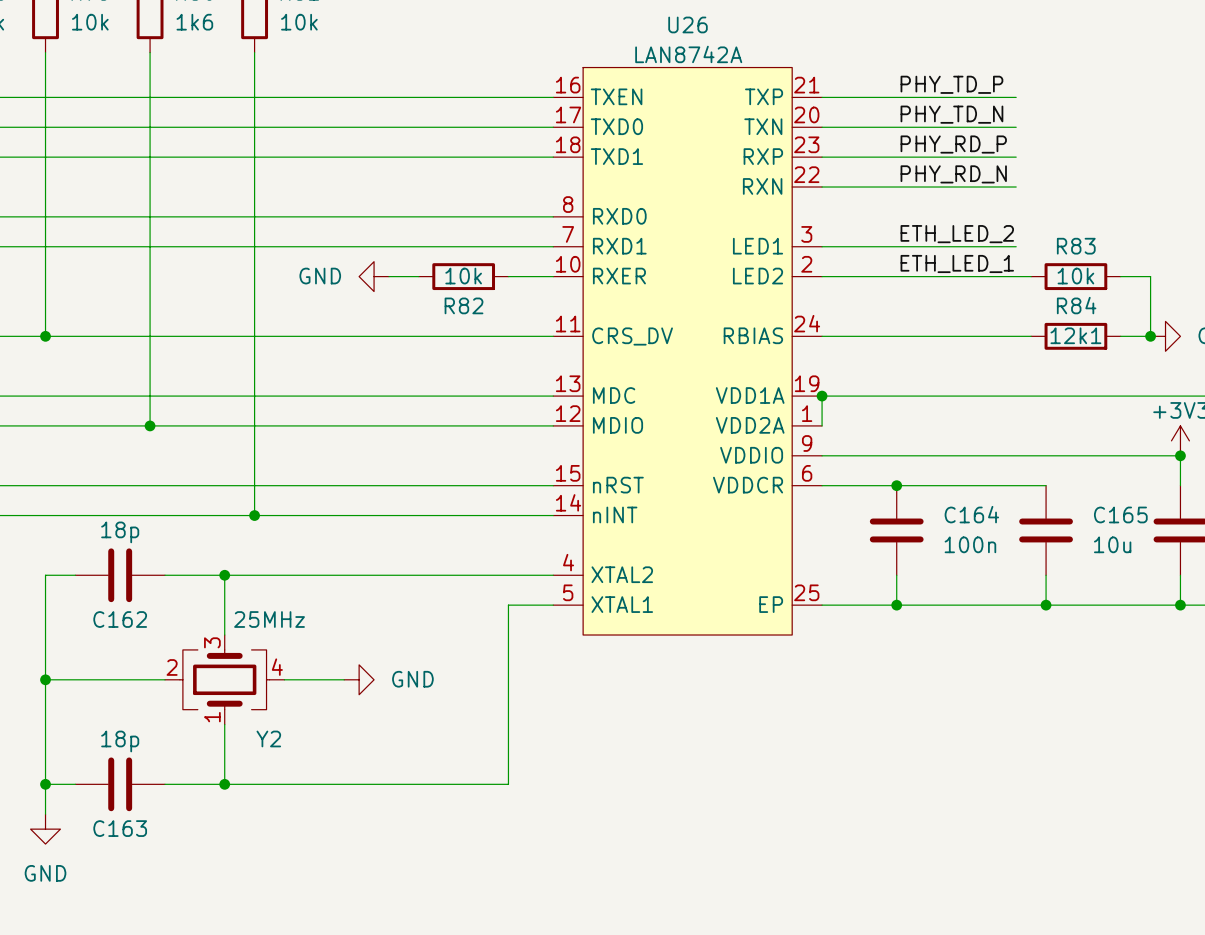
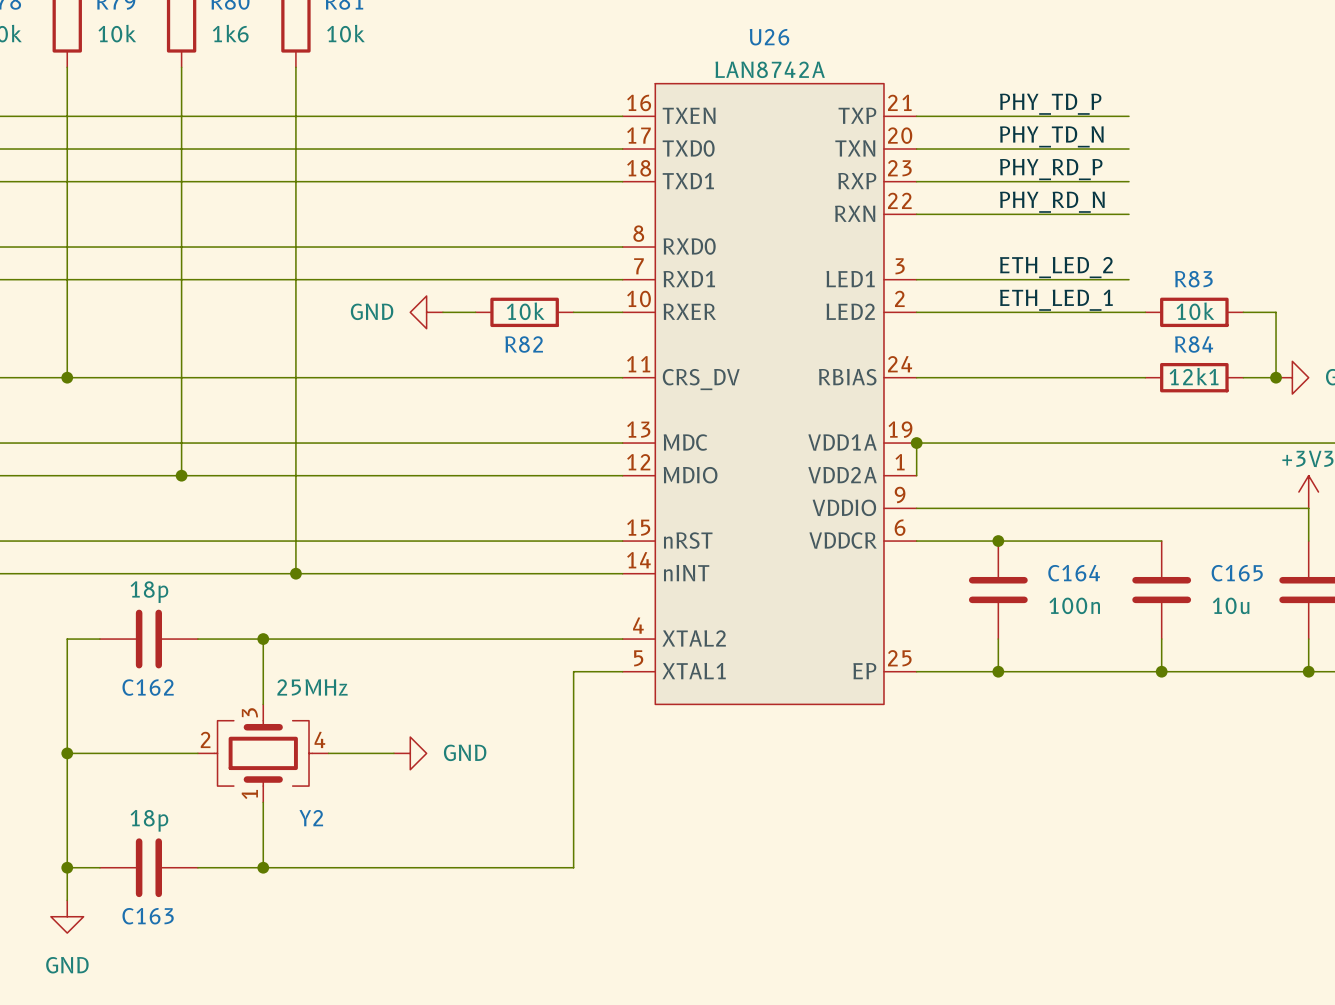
junction: (1180, 455) -> none

